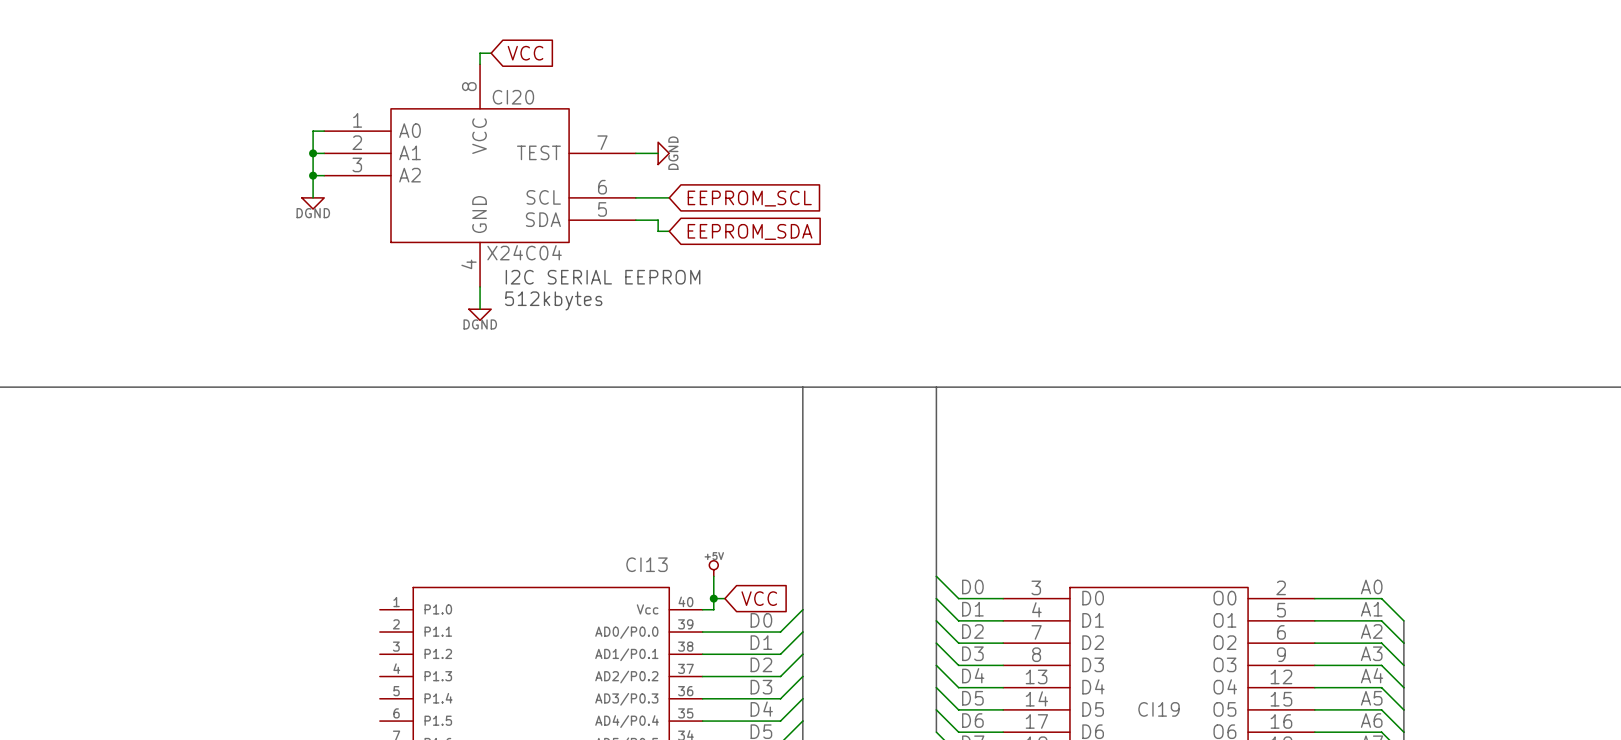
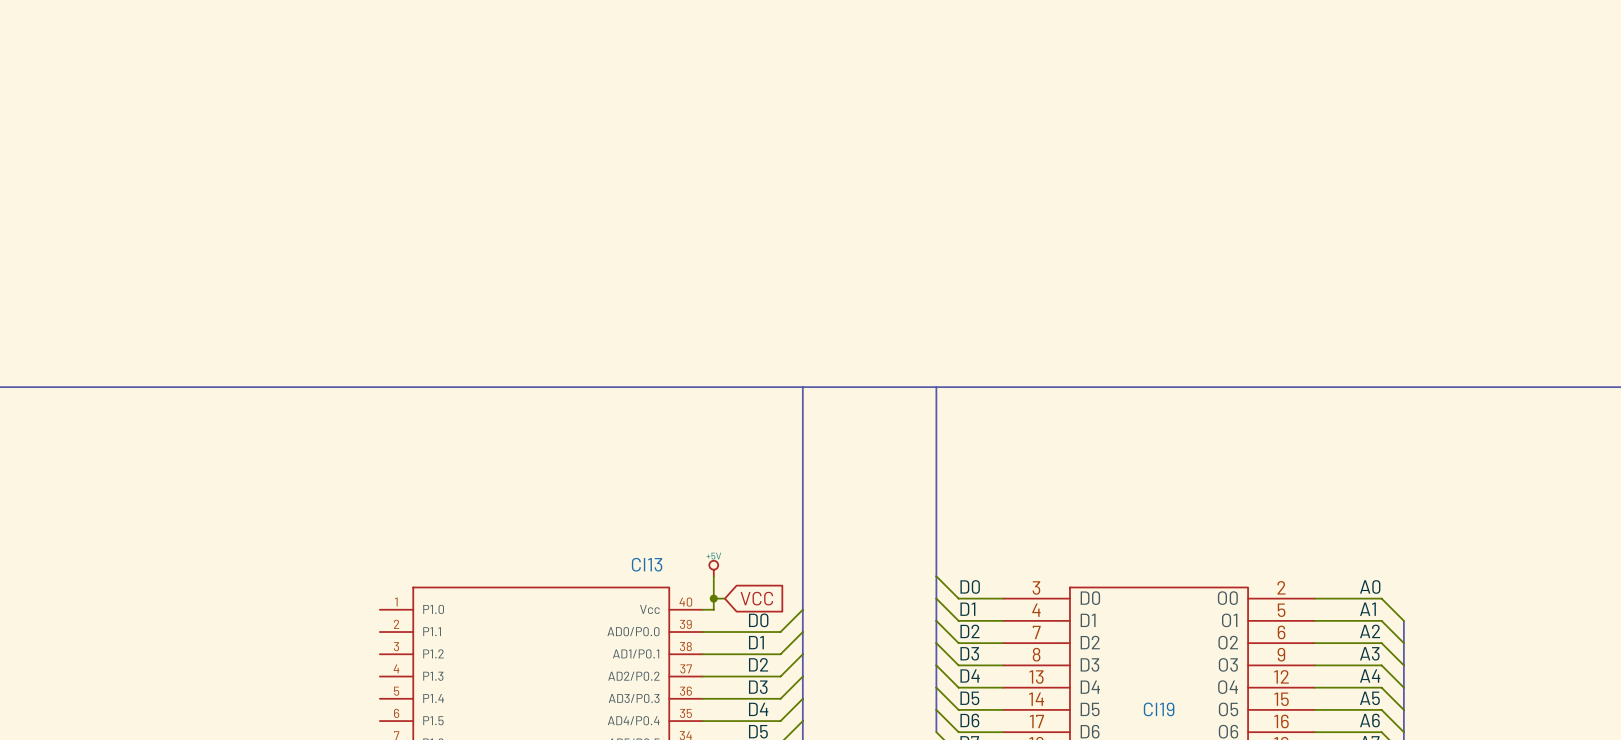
wire: (491, 53) (480, 53) (480, 64) -> none
global label: VCC (525, 53) -> none
wire: (324, 131) (313, 131) (313, 197) -> none
wire: (313, 153) (324, 153) -> none
junction: (313, 153) -> none
wire: (635, 153) (658, 153) -> none
power symbol: DGND (663, 153) -> none
wire: (313, 175) (324, 175) -> none
junction: (313, 175) -> none
CI20: X24C04 (480, 175) -> none
wire: (635, 197) (669, 197) -> none
global label: EEPROM_SCL (749, 198) -> none
power symbol: DGND (313, 203) -> none
wire: (635, 220) (658, 220) (658, 231) (669, 231) -> none
global label: EEPROM_SDA (750, 231) -> none
text: I2C SERIAL EEPROM (603, 277) -> none
wire: (480, 286) (480, 309) -> none
text: 512kbytes (553, 300) -> none
power symbol: DGND (480, 314) -> none

